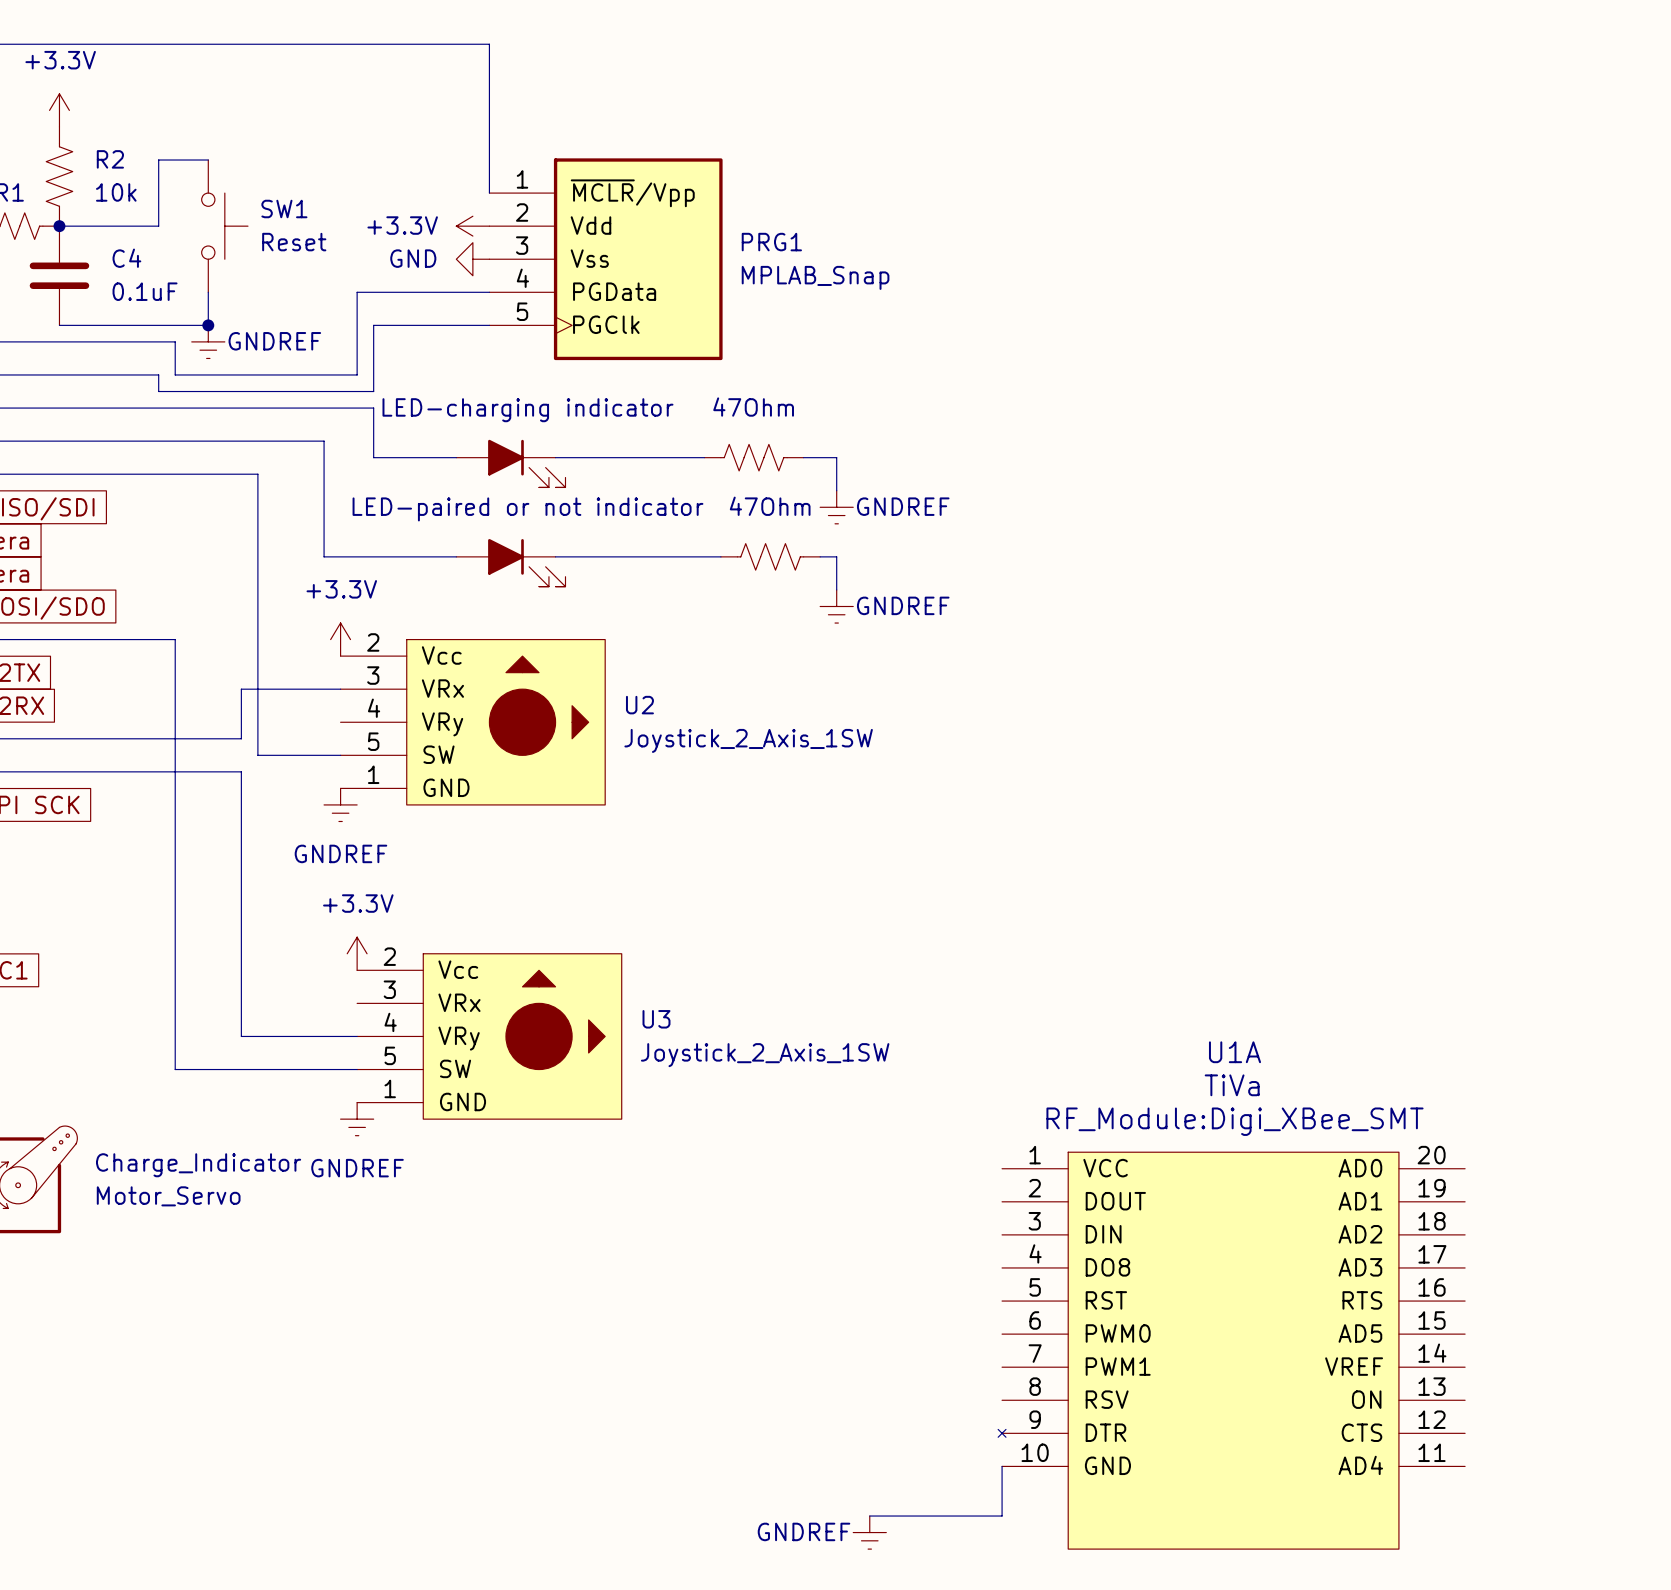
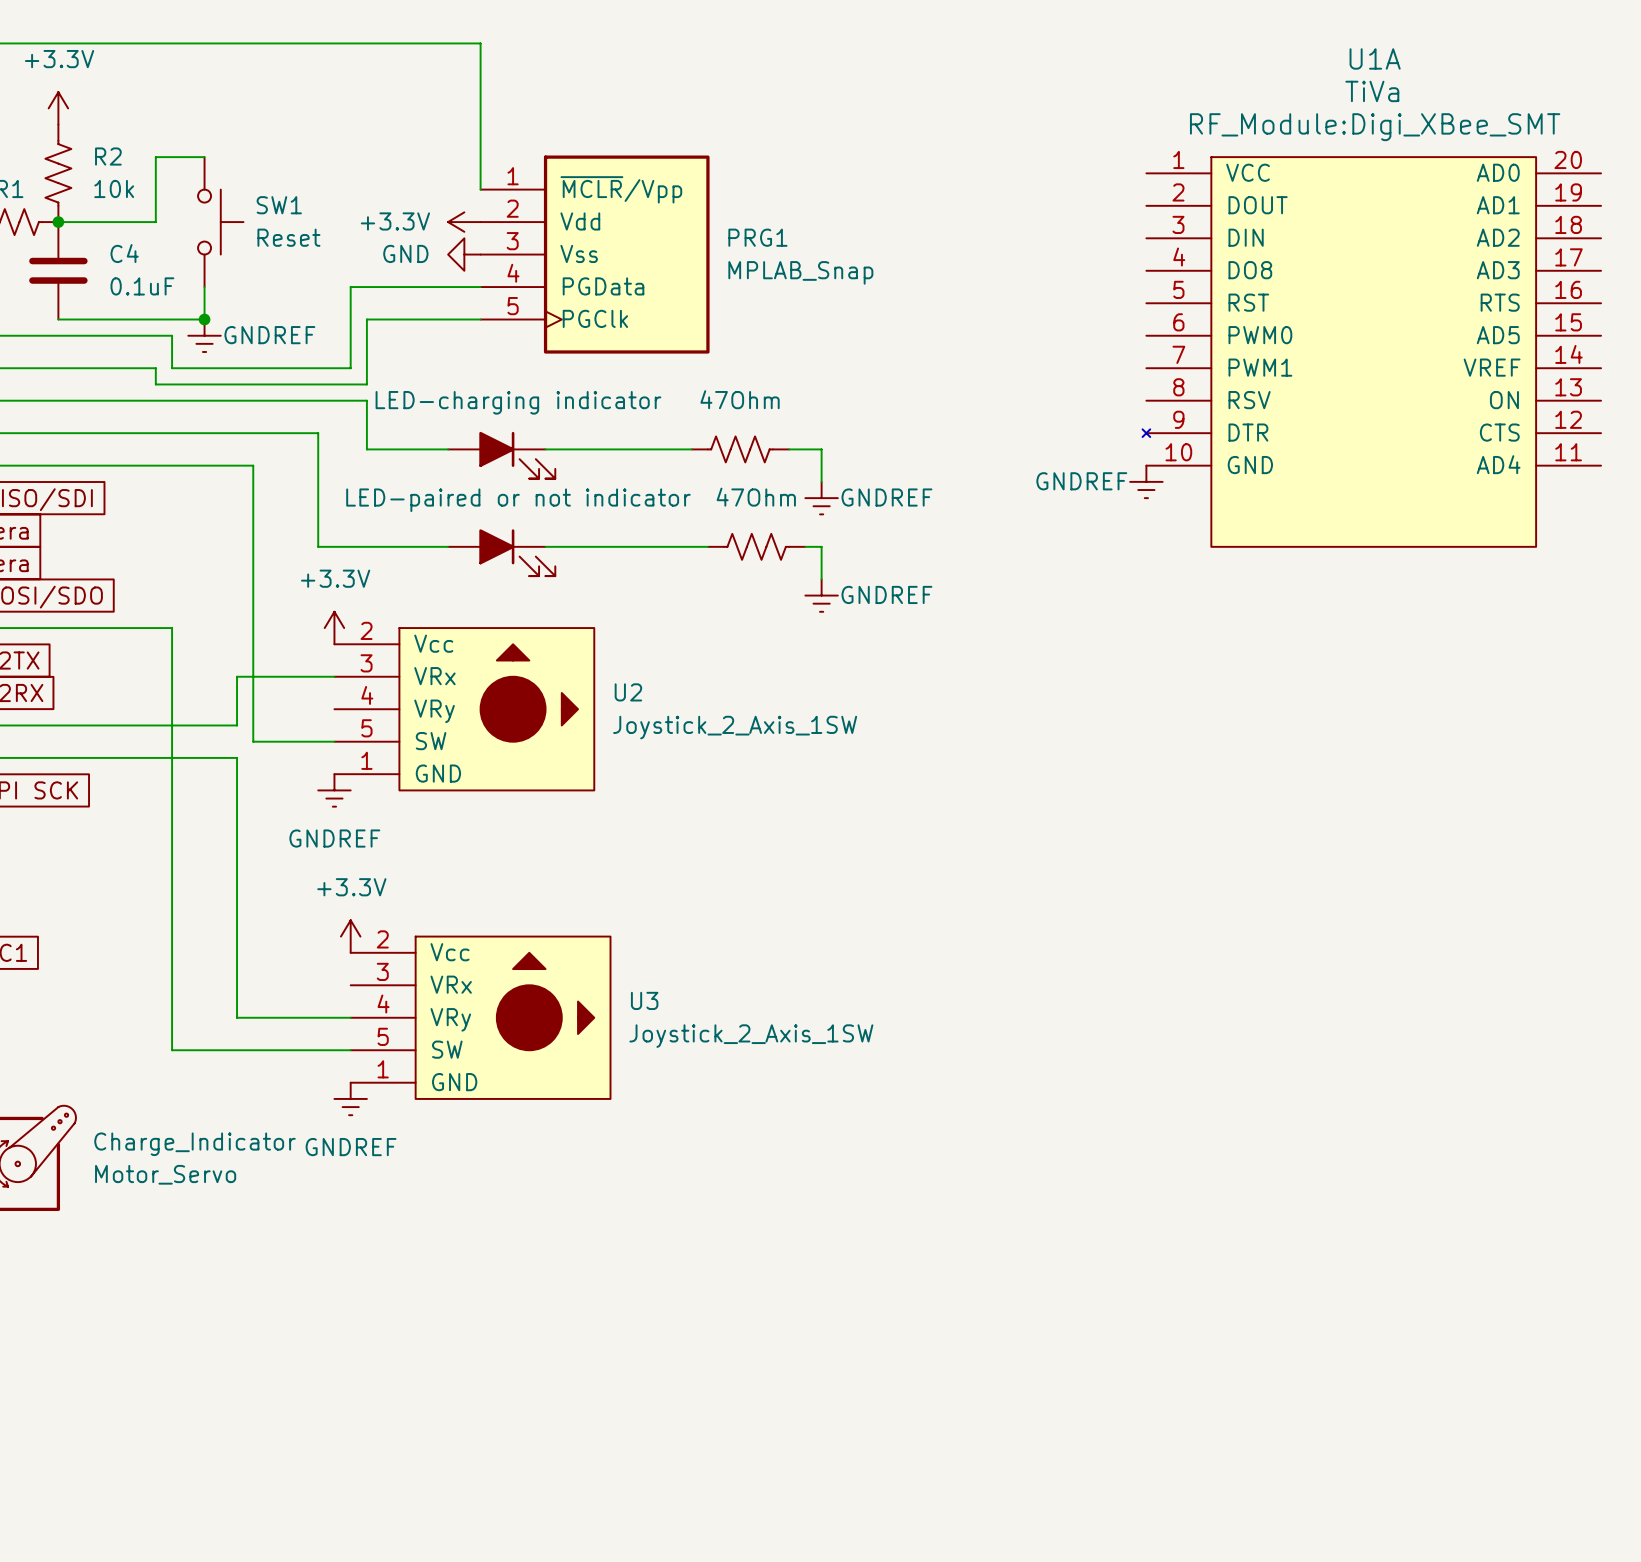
power symbol: none -> GNDREF (1146, 481)
U1A position: (1231, 1350) -> (1371, 351)
wire: (1002, 1466) (1002, 1516) (869, 1516) -> none
power symbol: GNDREF (869, 1532) -> none

